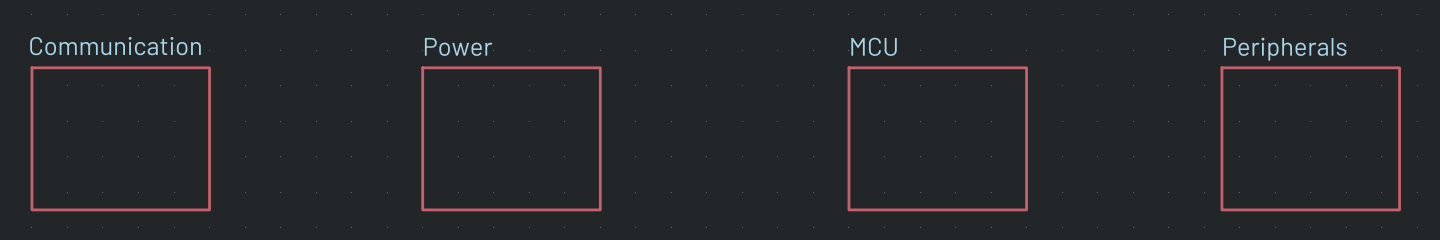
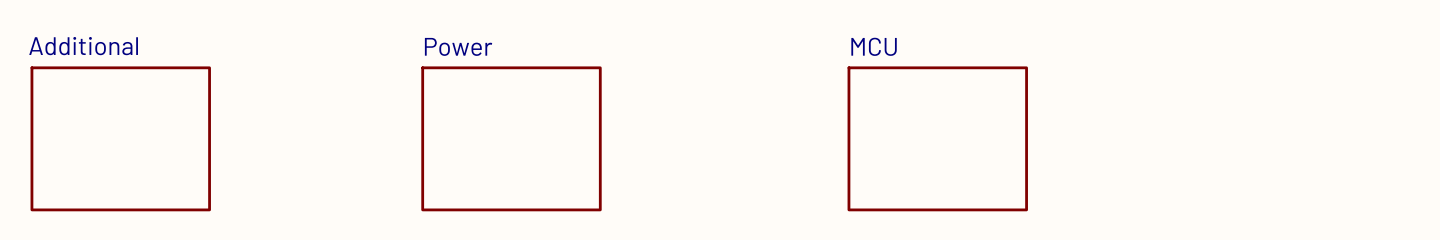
sheet Communication name: Communication (115, 46) -> Additional (83, 46)
sheet Peripherals: (1310, 138) -> none

